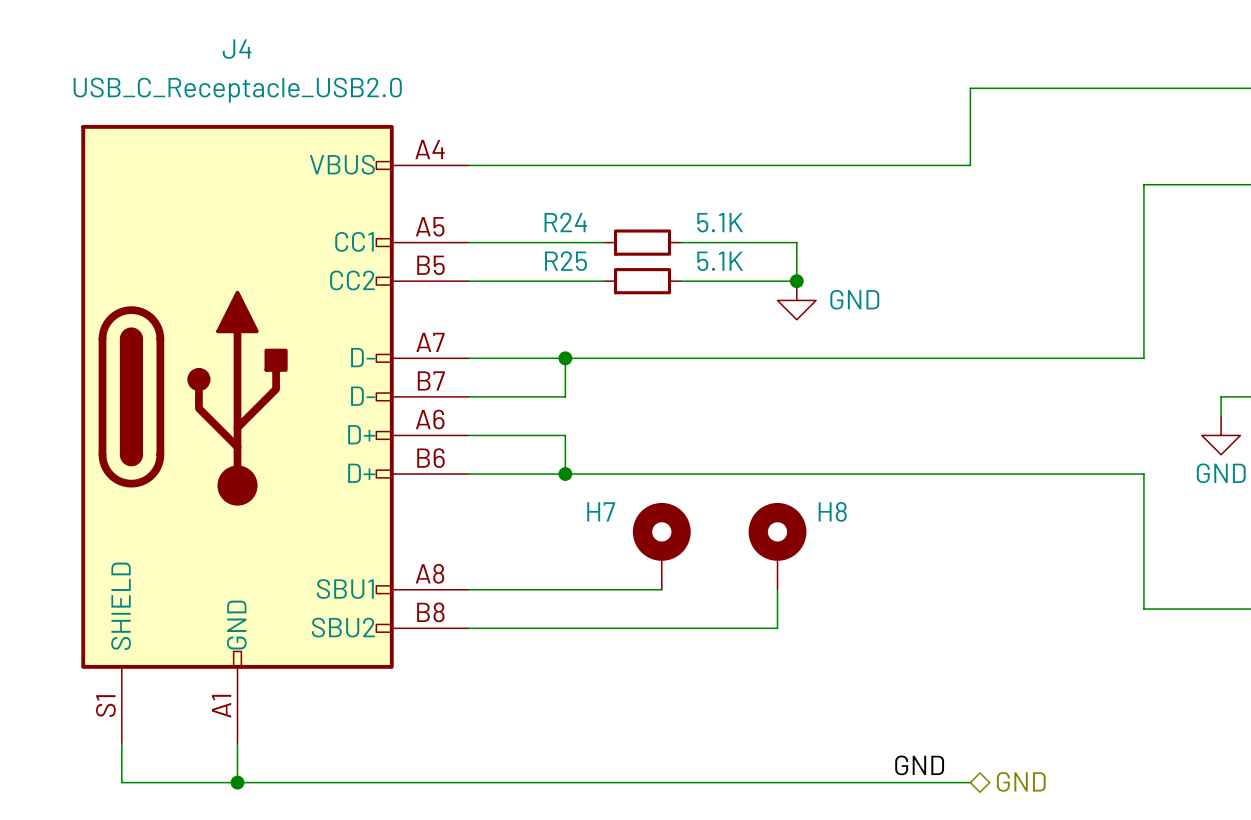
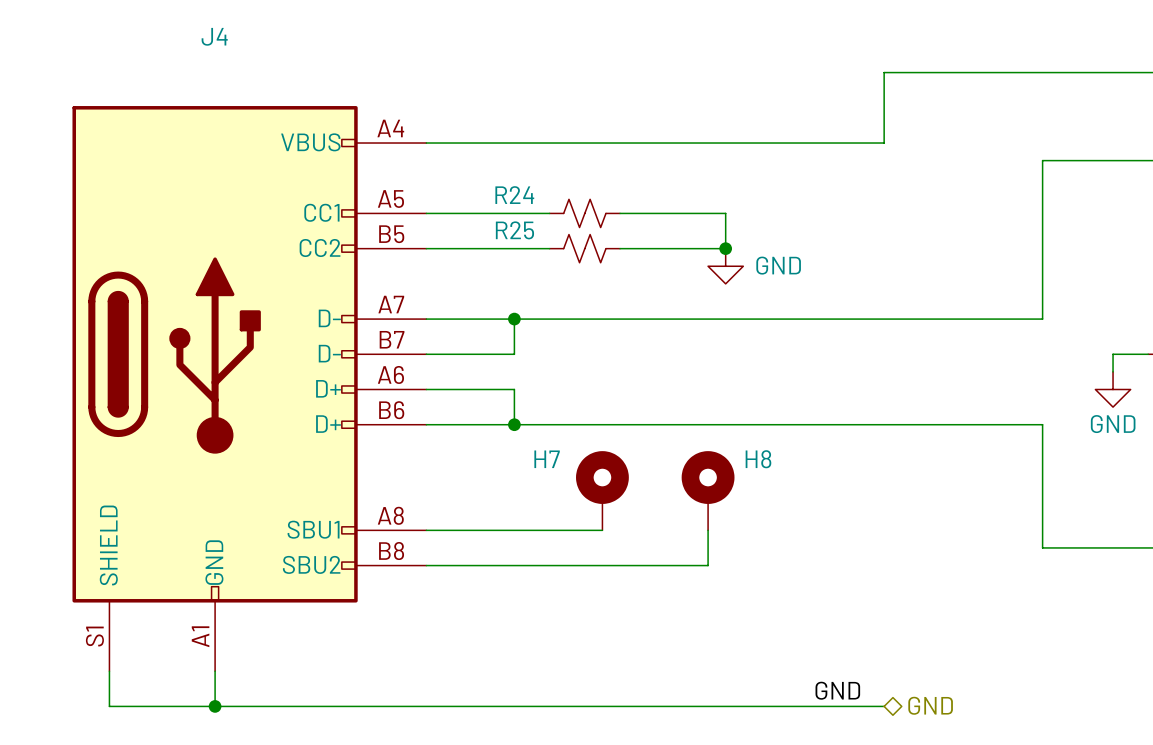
J4 value: USB_C_Receptacle_USB2.0 (237, 90) -> none
R24 value: 5.1K (720, 222) -> none
R24 symbol: [603, 229, 682, 256] -> [549, 199, 621, 228]
R25 value: 5.1K (720, 261) -> none
R25 symbol: [603, 268, 682, 295] -> [549, 234, 621, 263]

